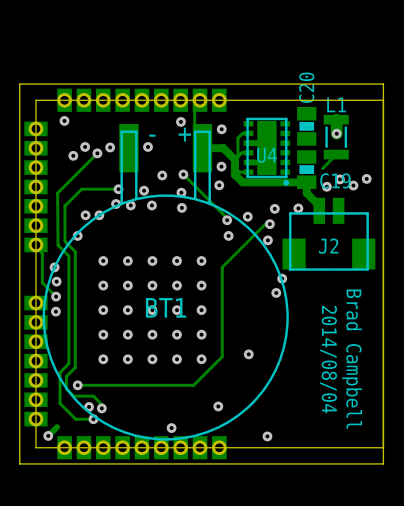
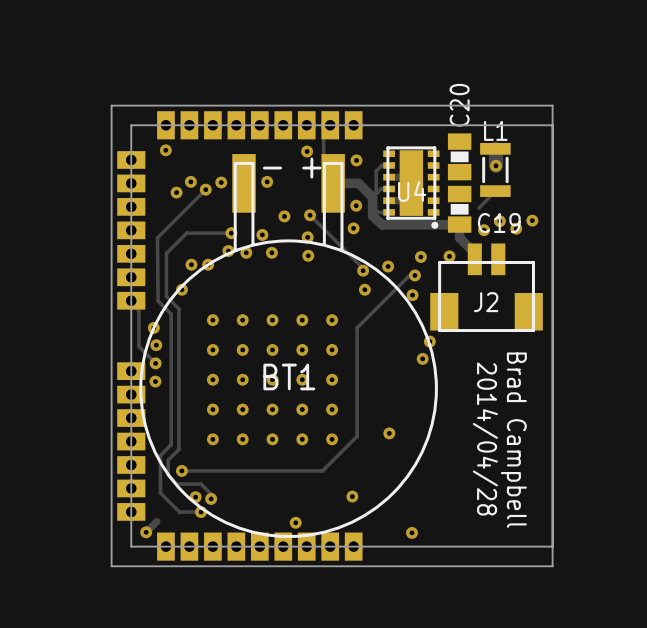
text: 2014/08/04 (328, 359) -> 2014/04/28 (485, 438)

